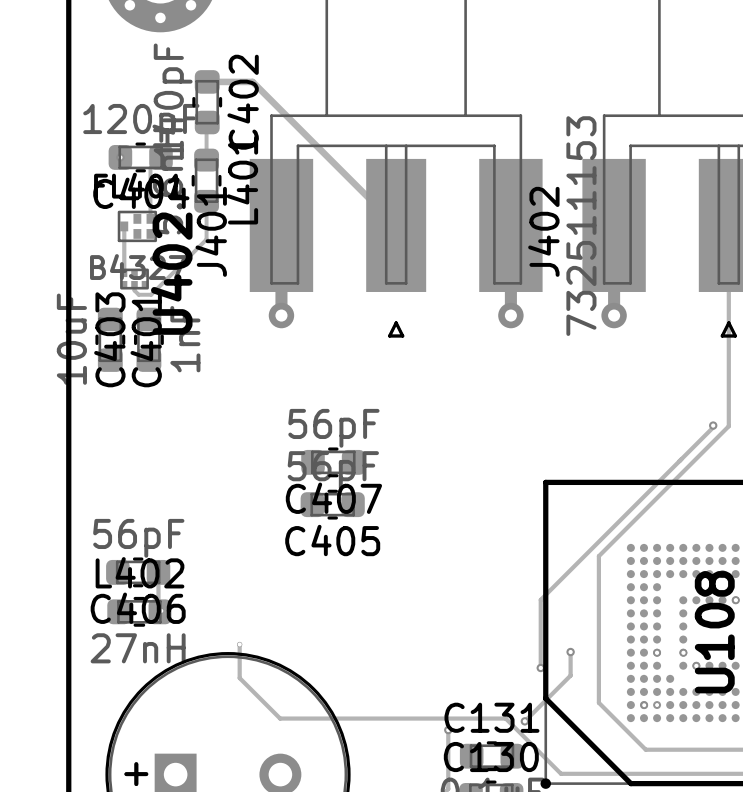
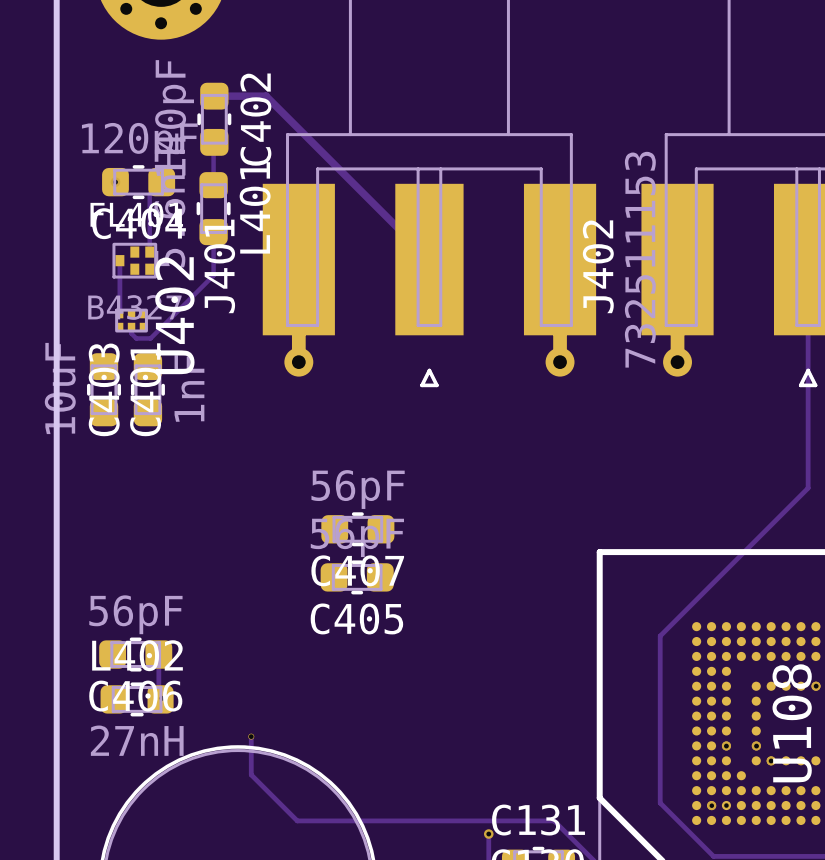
track: (713, 425) (540, 599) (540, 668) -> none
via: (713, 425) -> none
track: (570, 652) (570, 675) (524, 721) -> none
via: (570, 652) -> none
via: (540, 668) -> none
via: (524, 721) -> none

